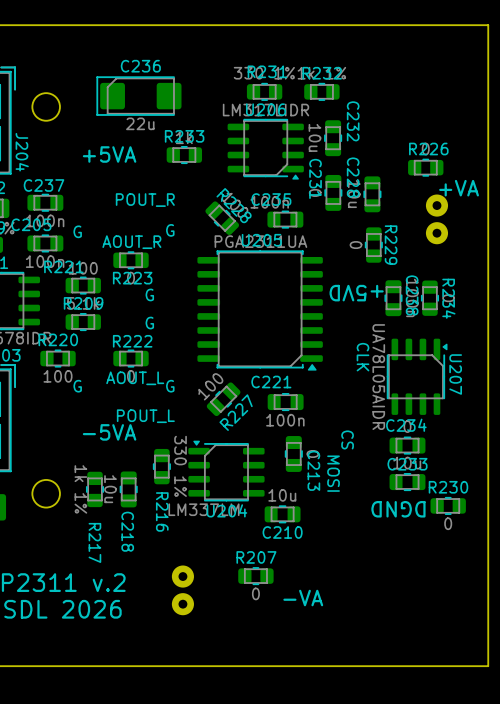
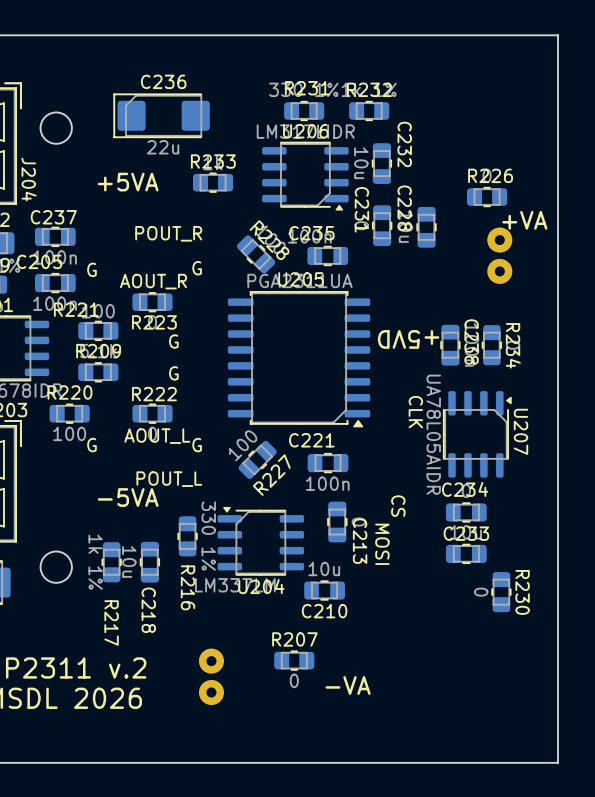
R229: 0 (373, 245) -> none
R230 rotation: 0° (448, 505) -> 90° clockwise (501, 592)
text: DGND (398, 509) -> none

